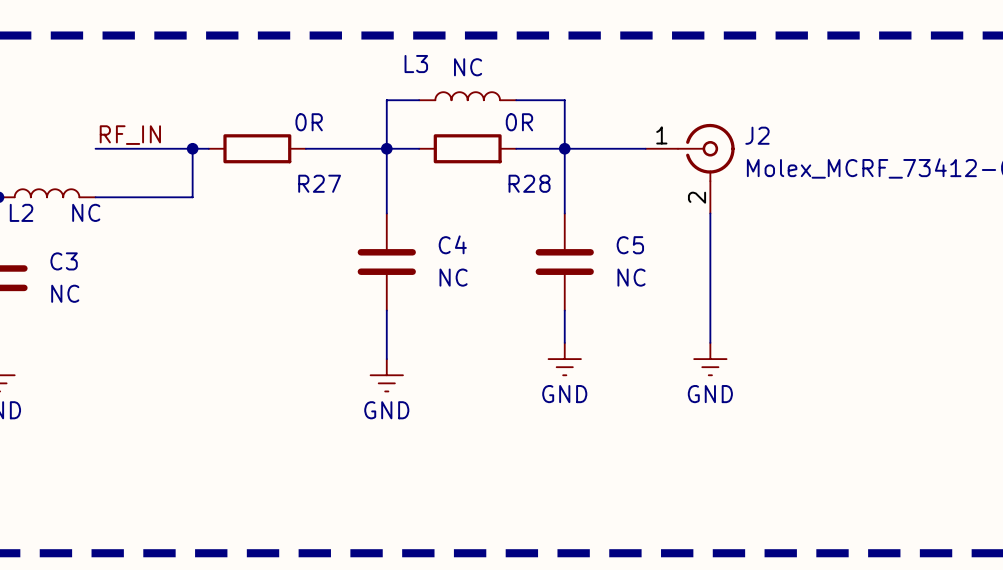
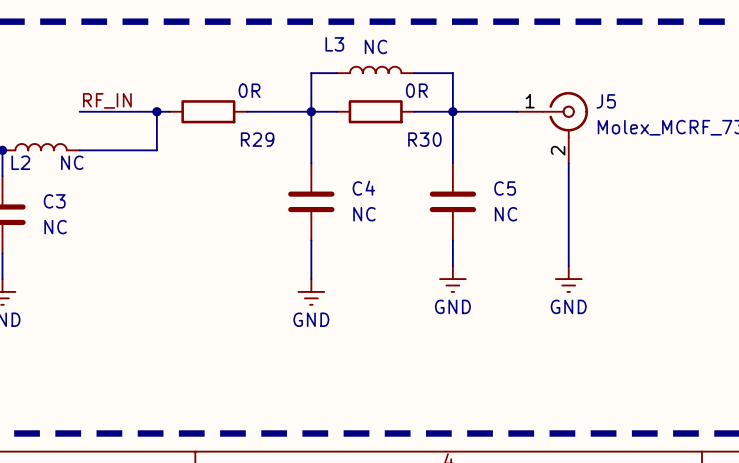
J2 name: J2 (757, 135) -> J5 (606, 101)
R27 name: R27 (319, 183) -> R29 (257, 139)
R28 name: R28 (529, 183) -> R30 (424, 139)

